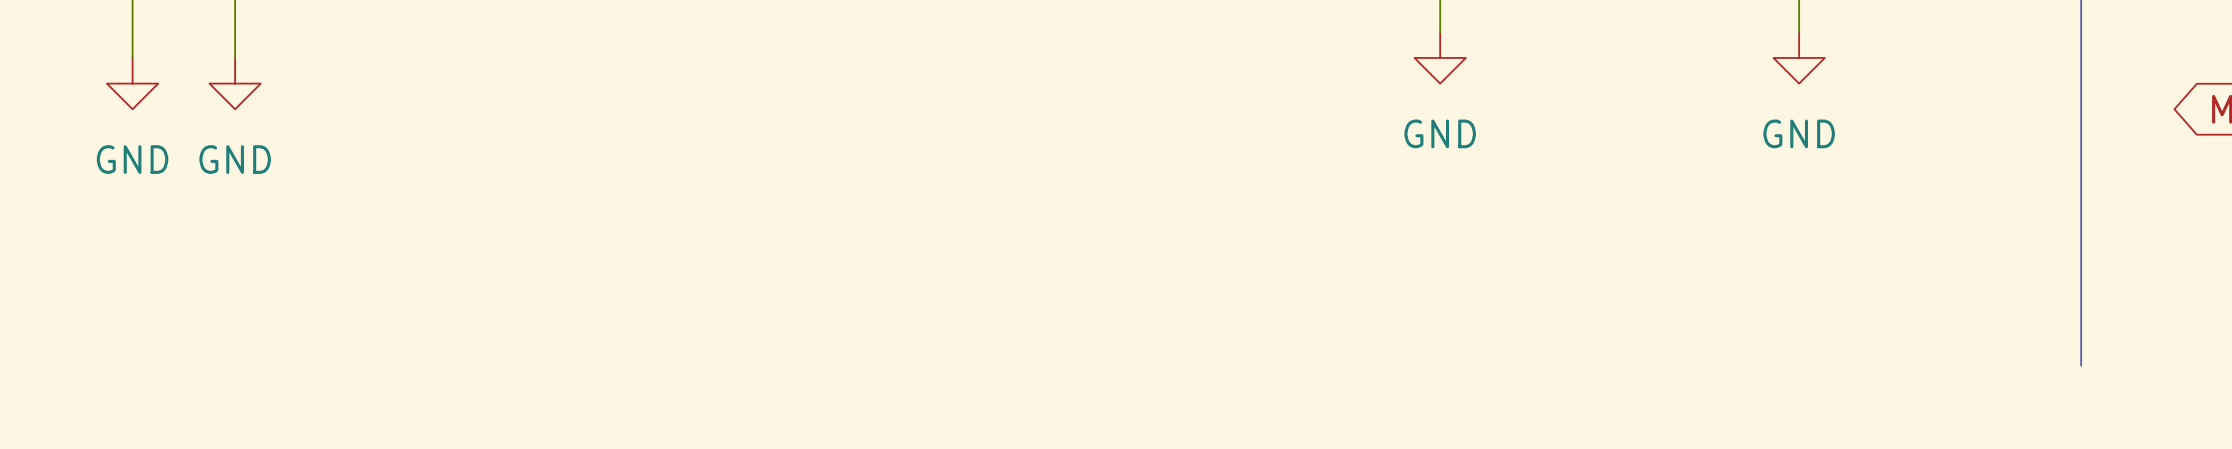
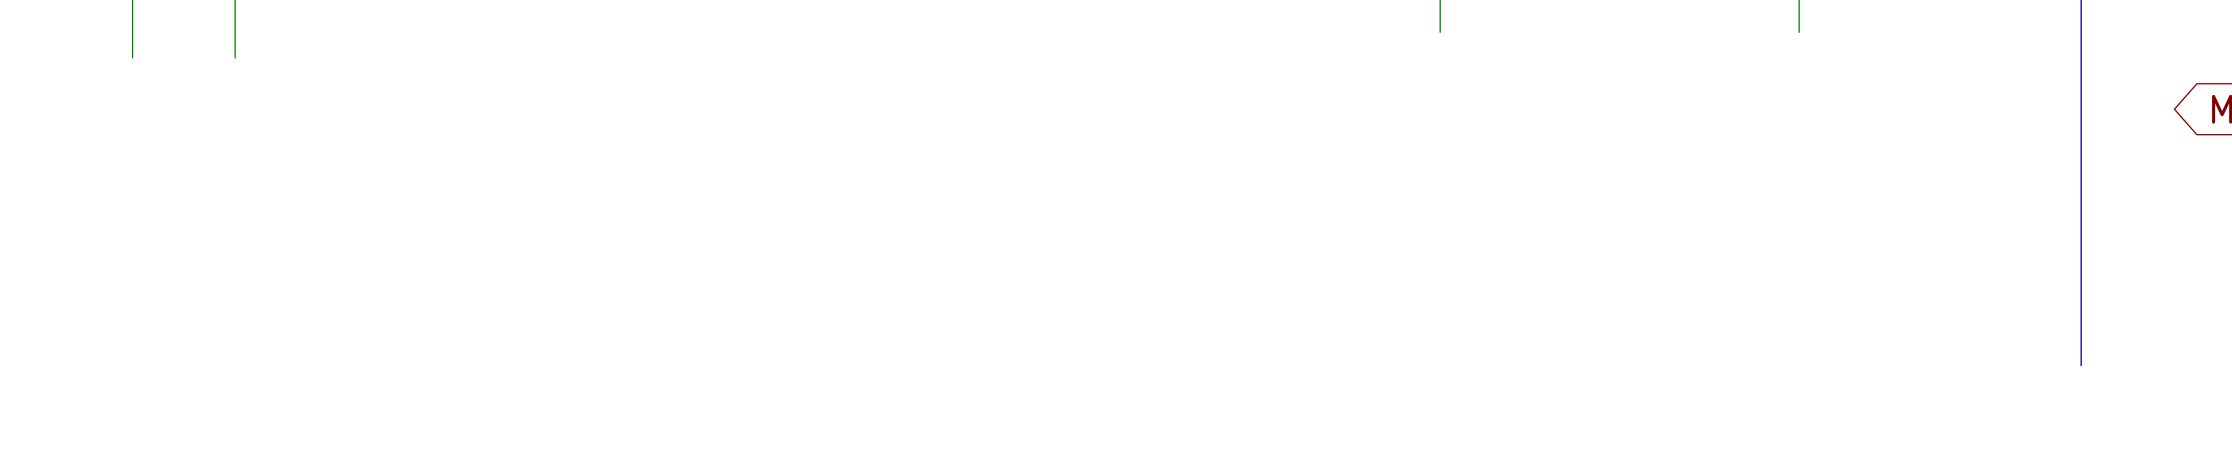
power symbol: GND (1440, 57) -> none
power symbol: GND (1799, 57) -> none
power symbol: GND (132, 83) -> none
power symbol: GND (235, 83) -> none

